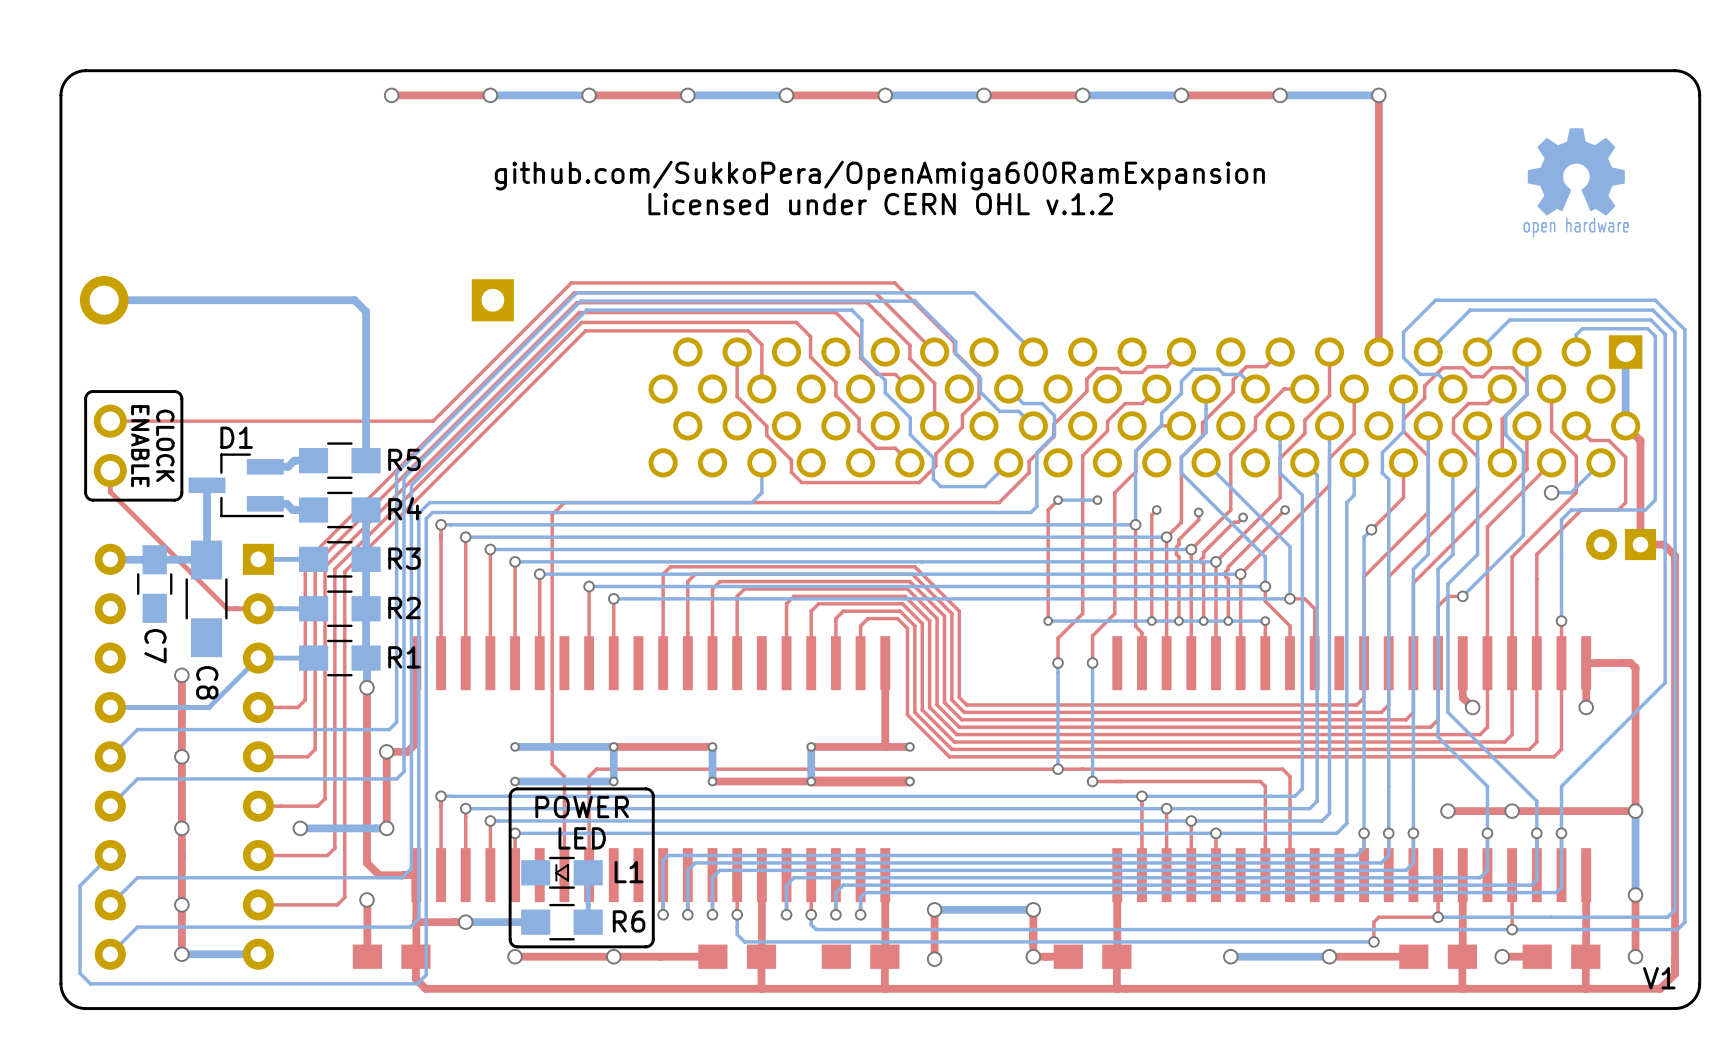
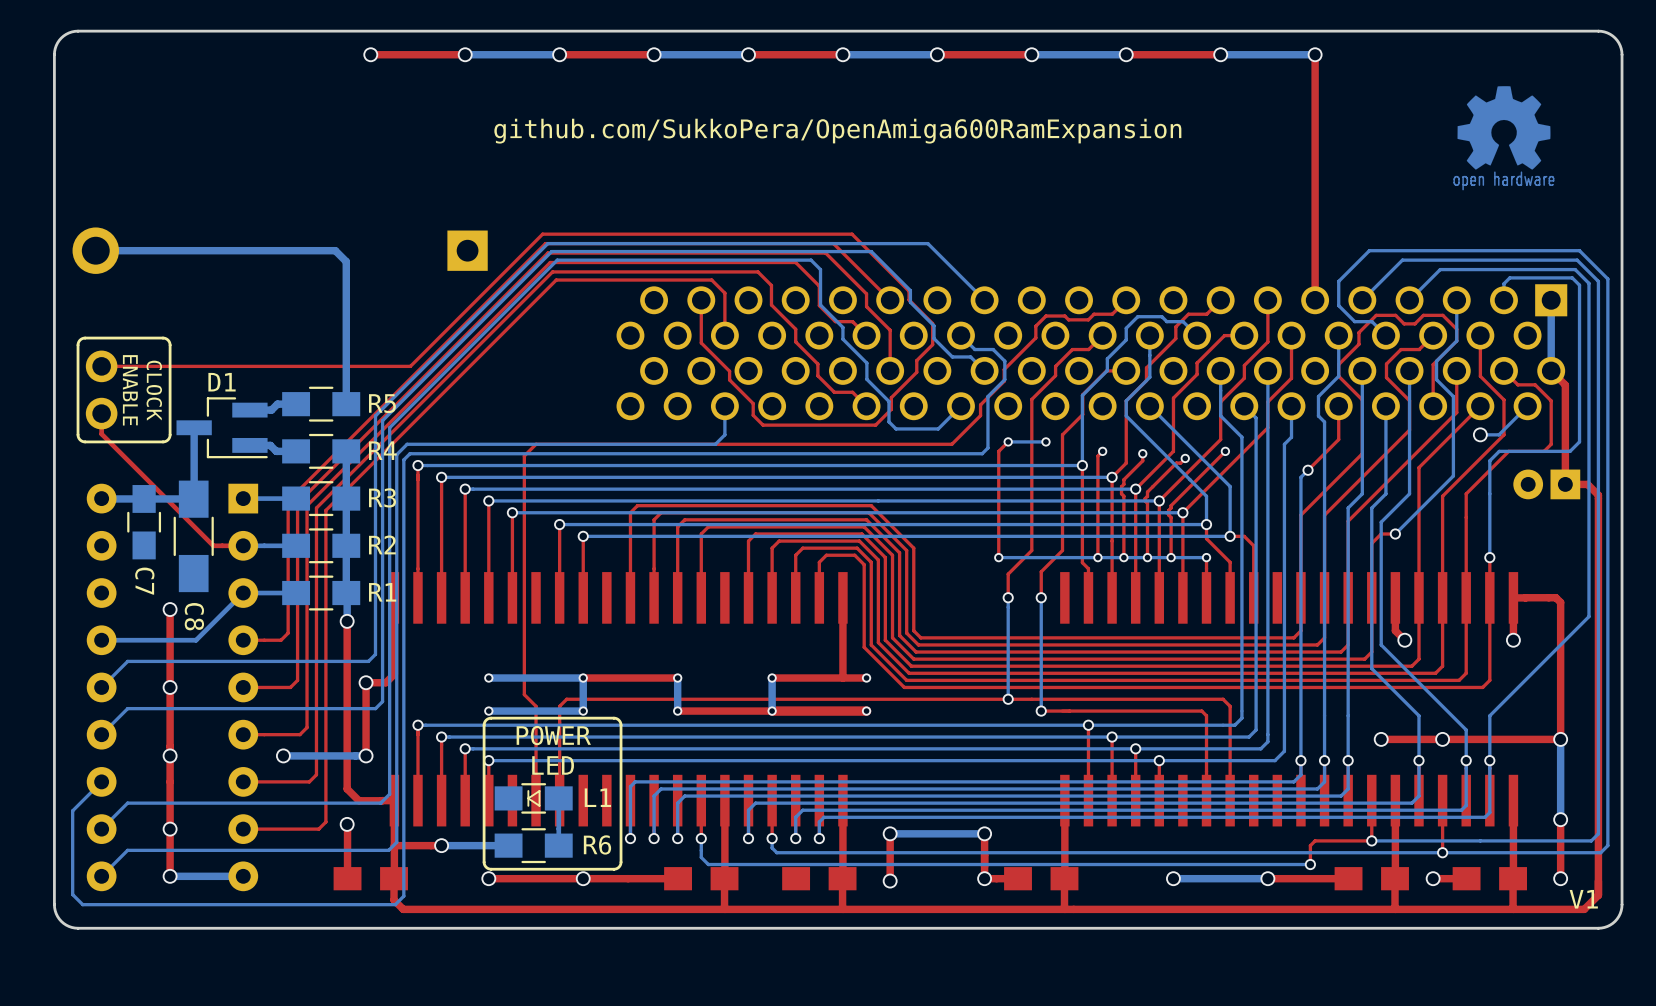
text: Licensed under CERN OHL v.1.2 (880, 204) -> none

